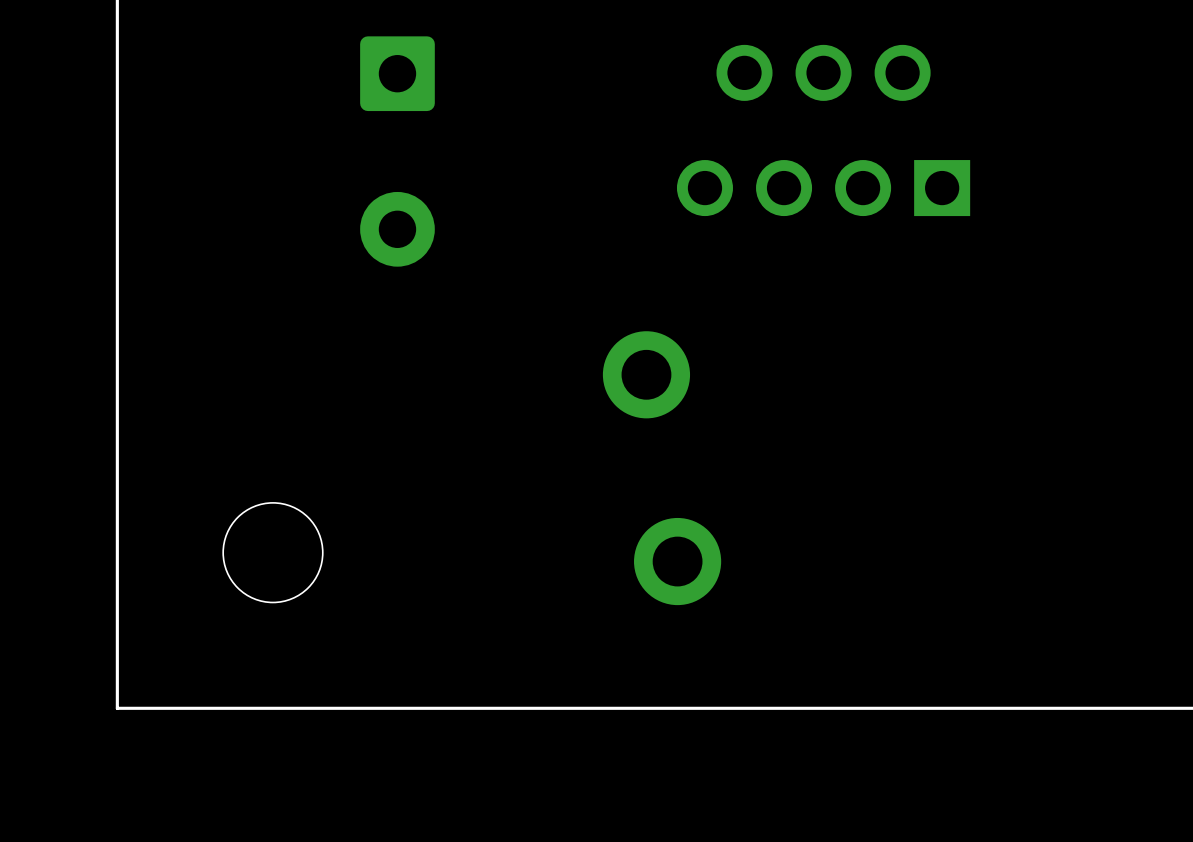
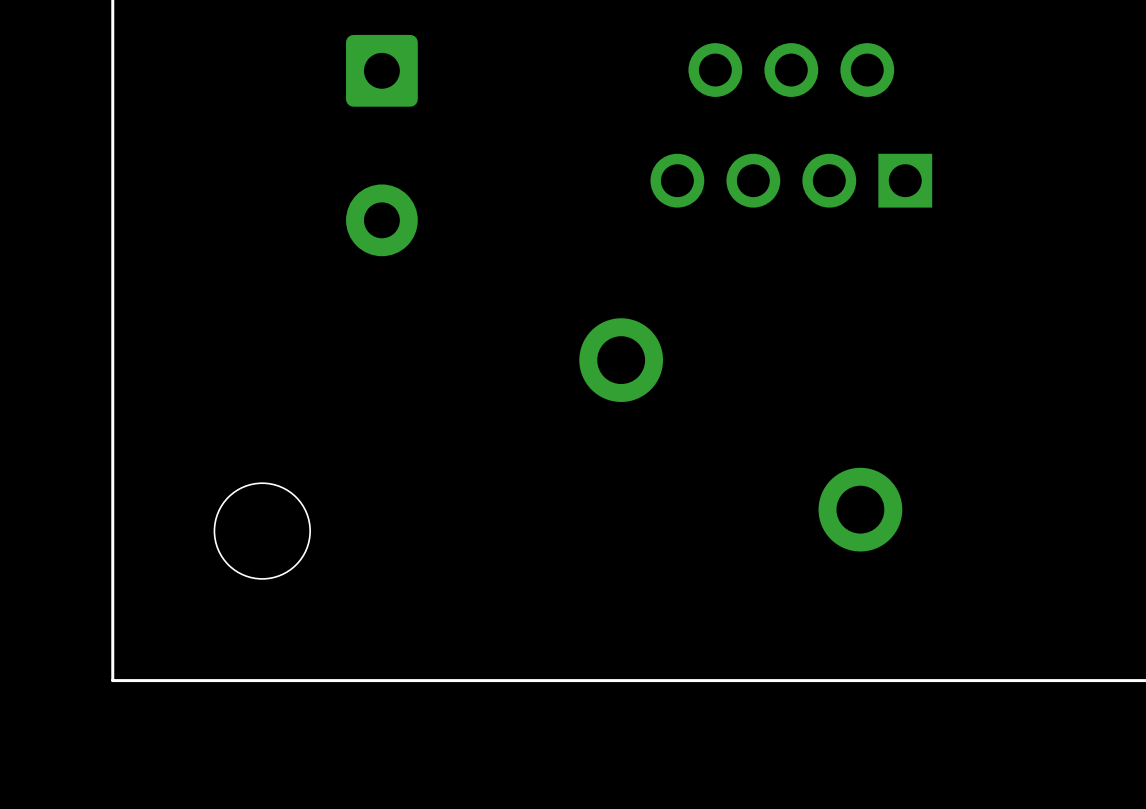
part position: (677, 561) -> (860, 509)

